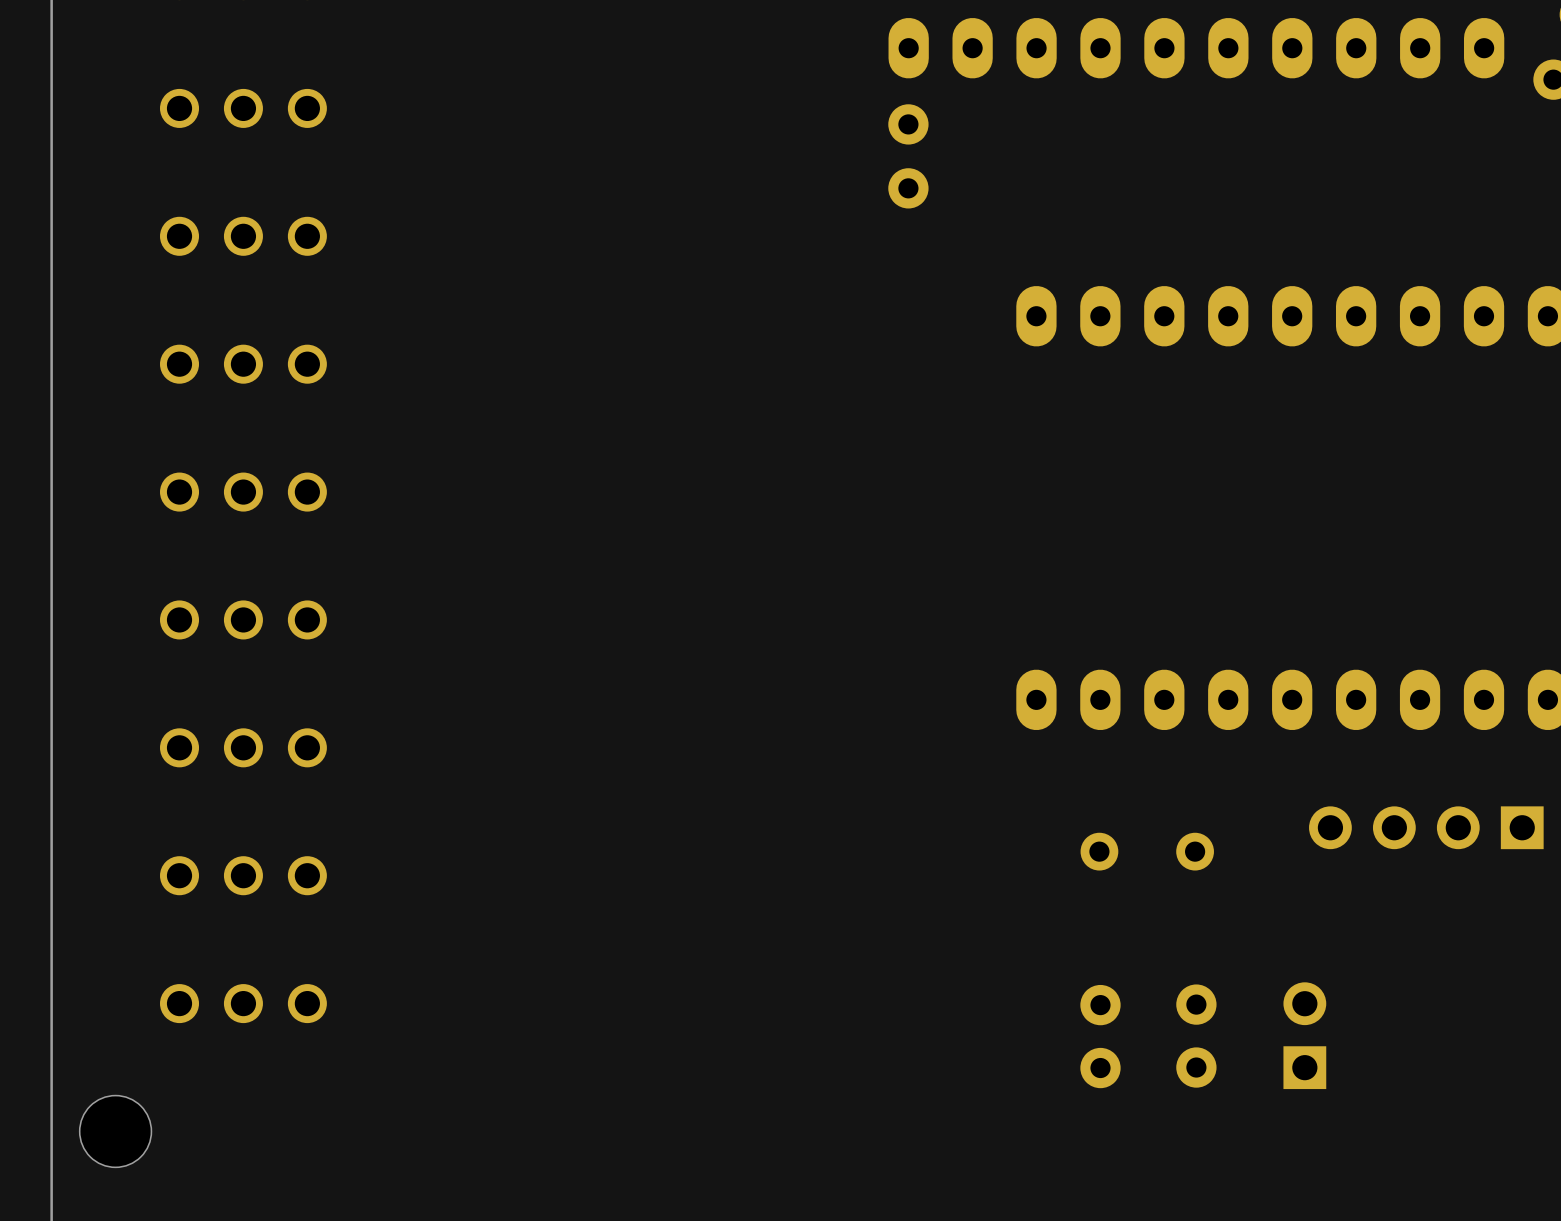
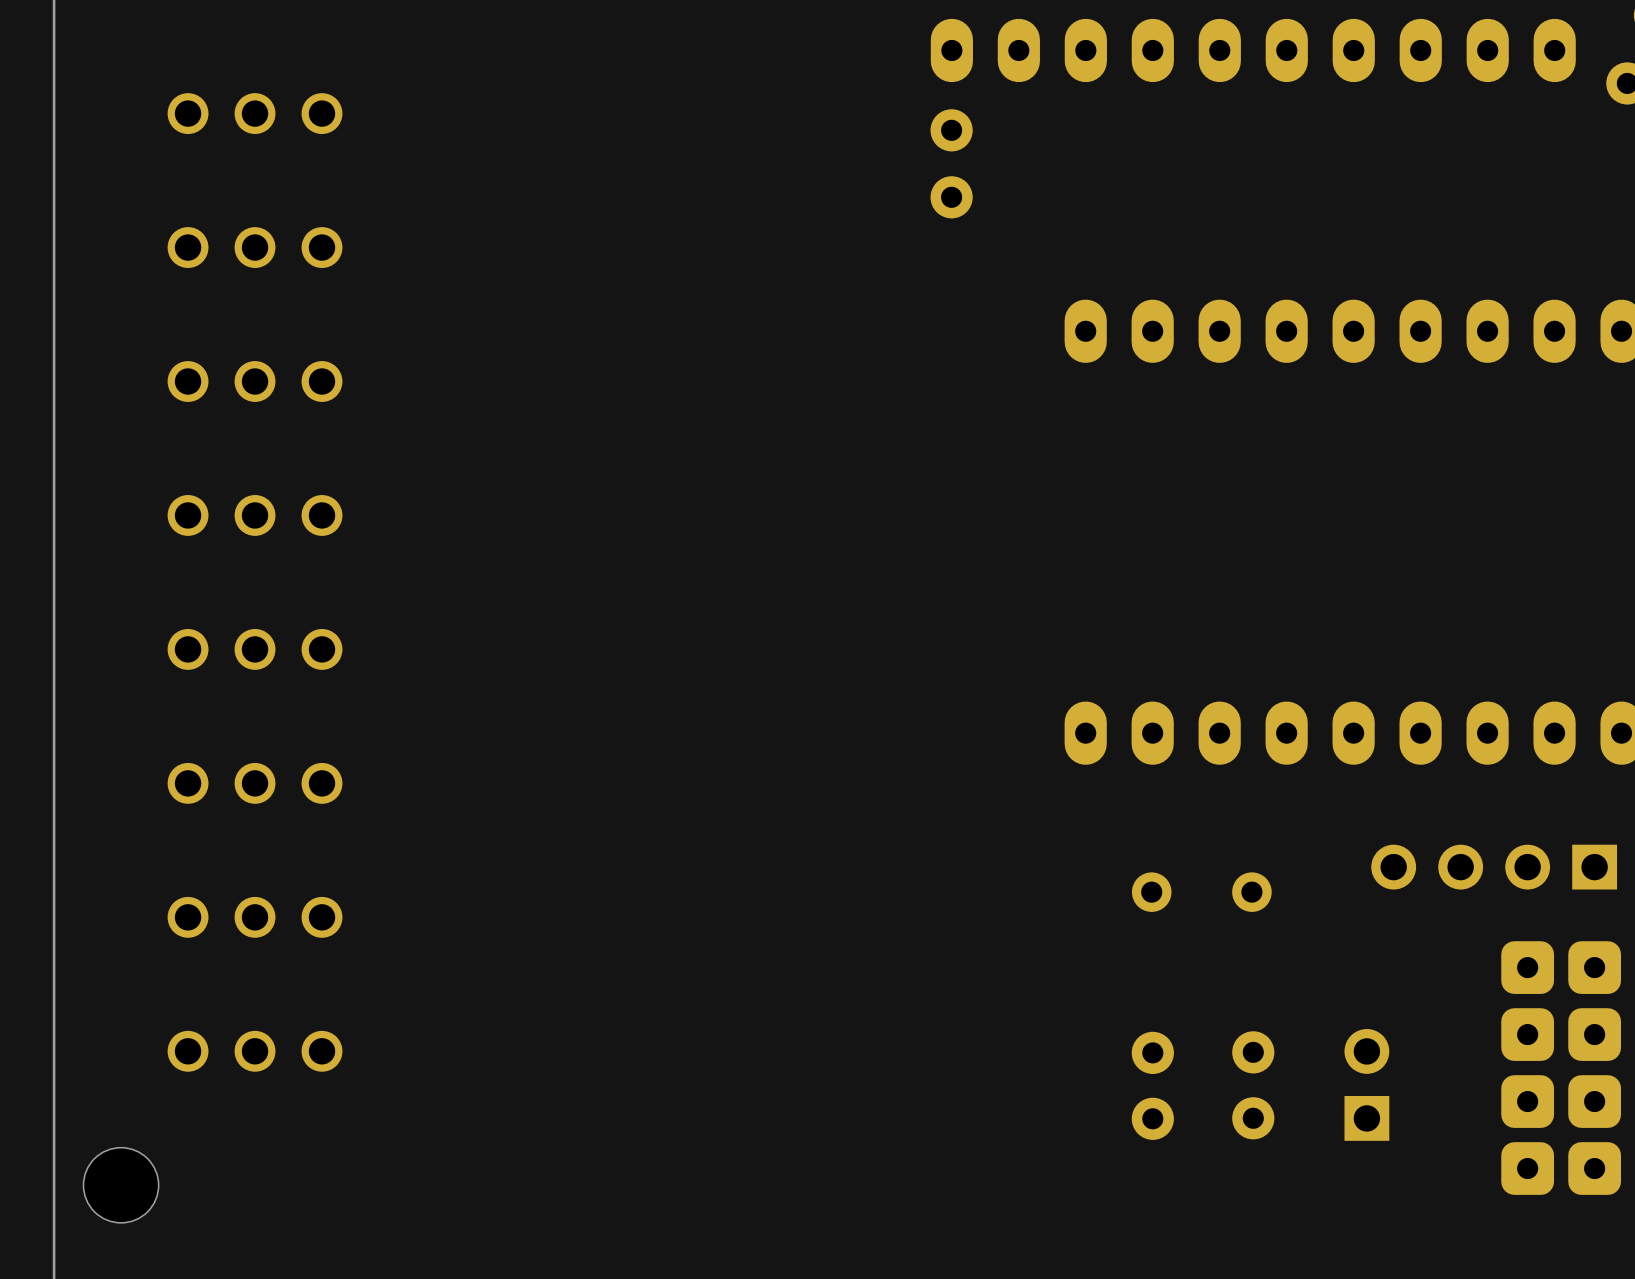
part: none -> (1527, 967)
part: none -> (1594, 967)
part: none -> (1527, 1034)
part: none -> (1594, 1034)
part: none -> (1527, 1101)
part: none -> (1594, 1101)
part: none -> (1527, 1168)
part: none -> (1594, 1168)

